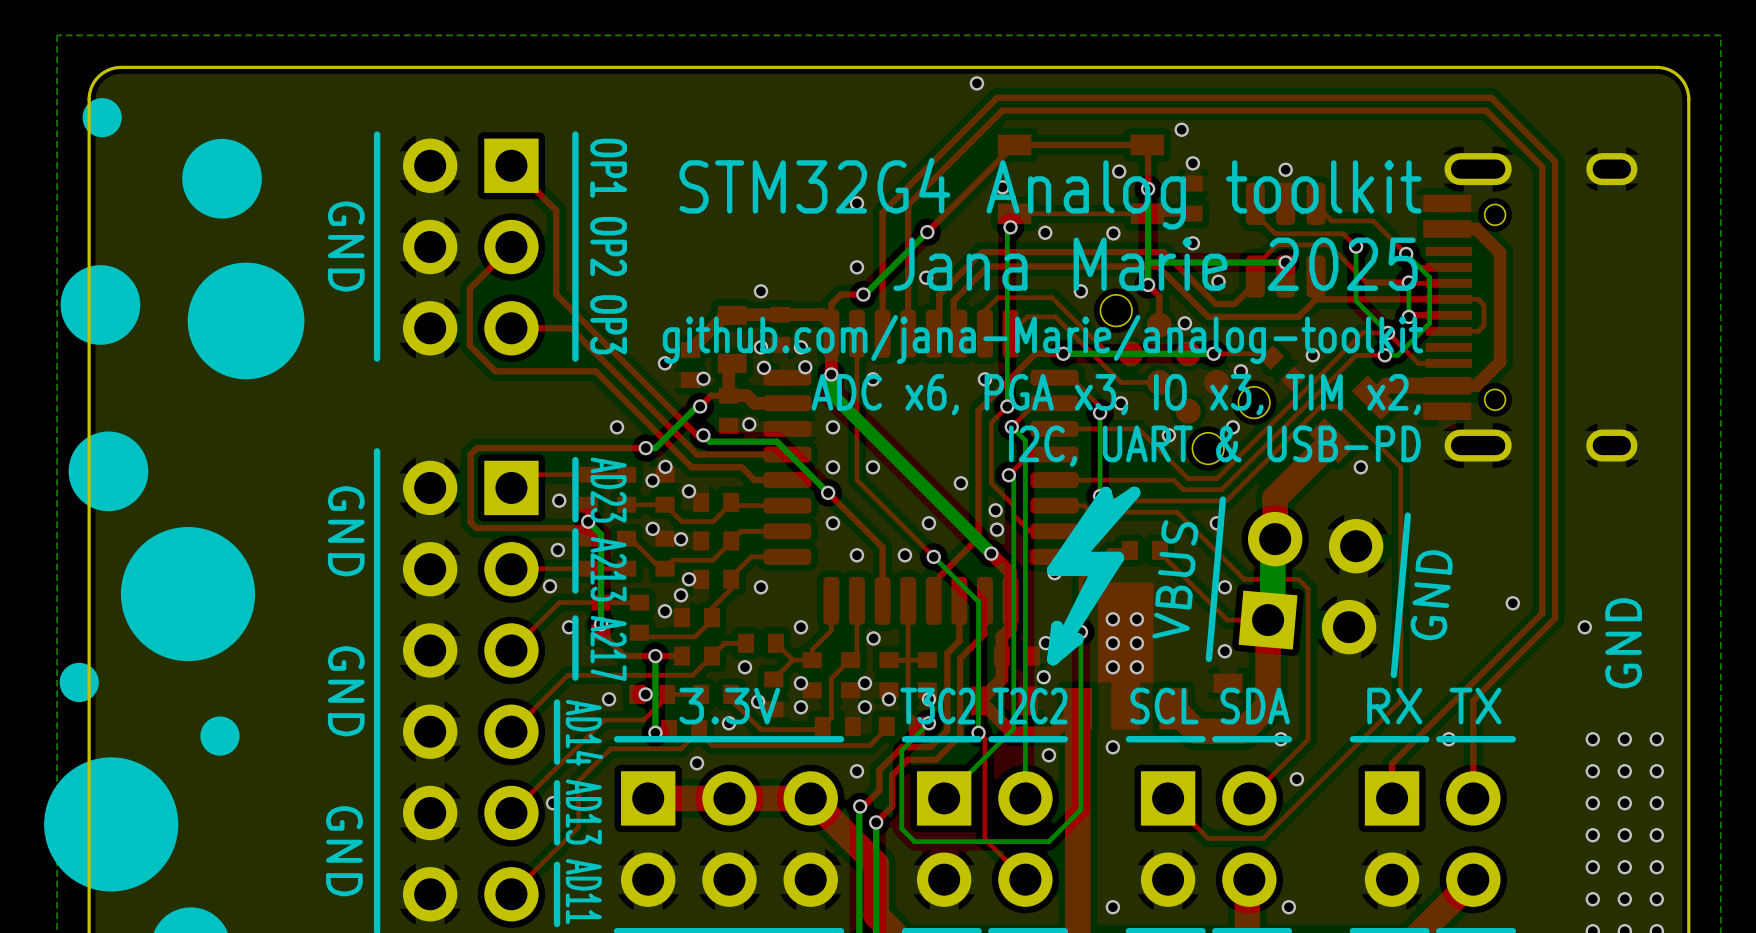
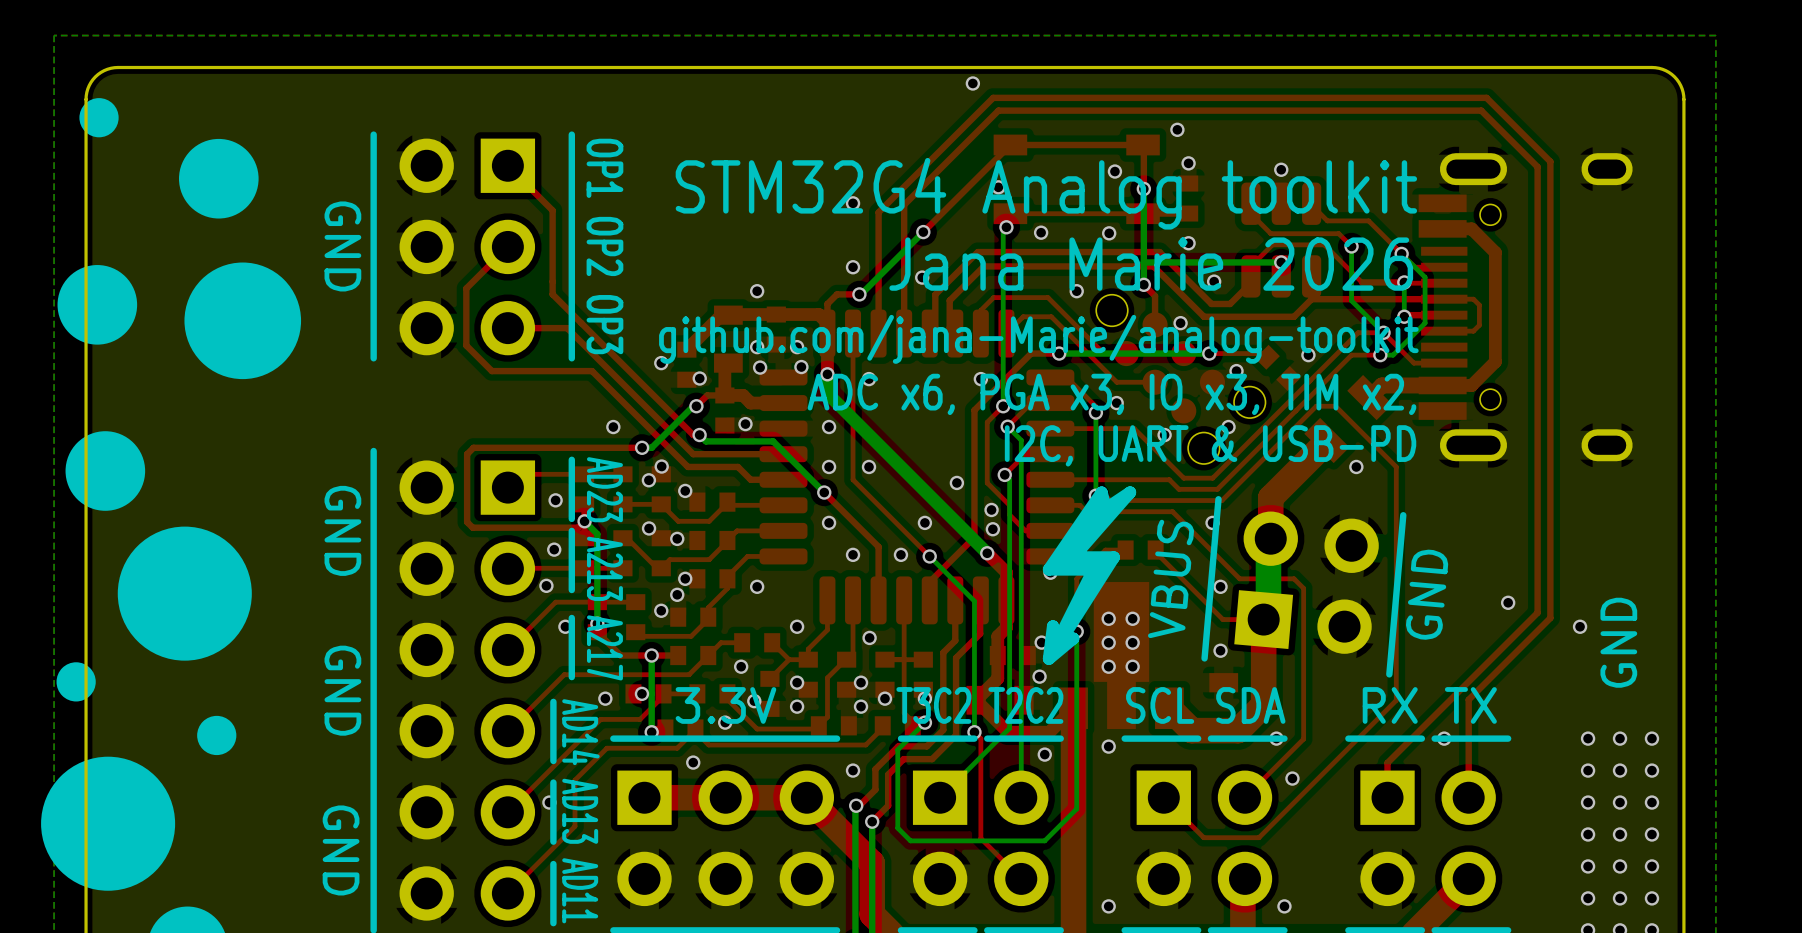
text: Jana Marie 2025 (1155, 264) -> Jana Marie 2026 (1151, 264)

